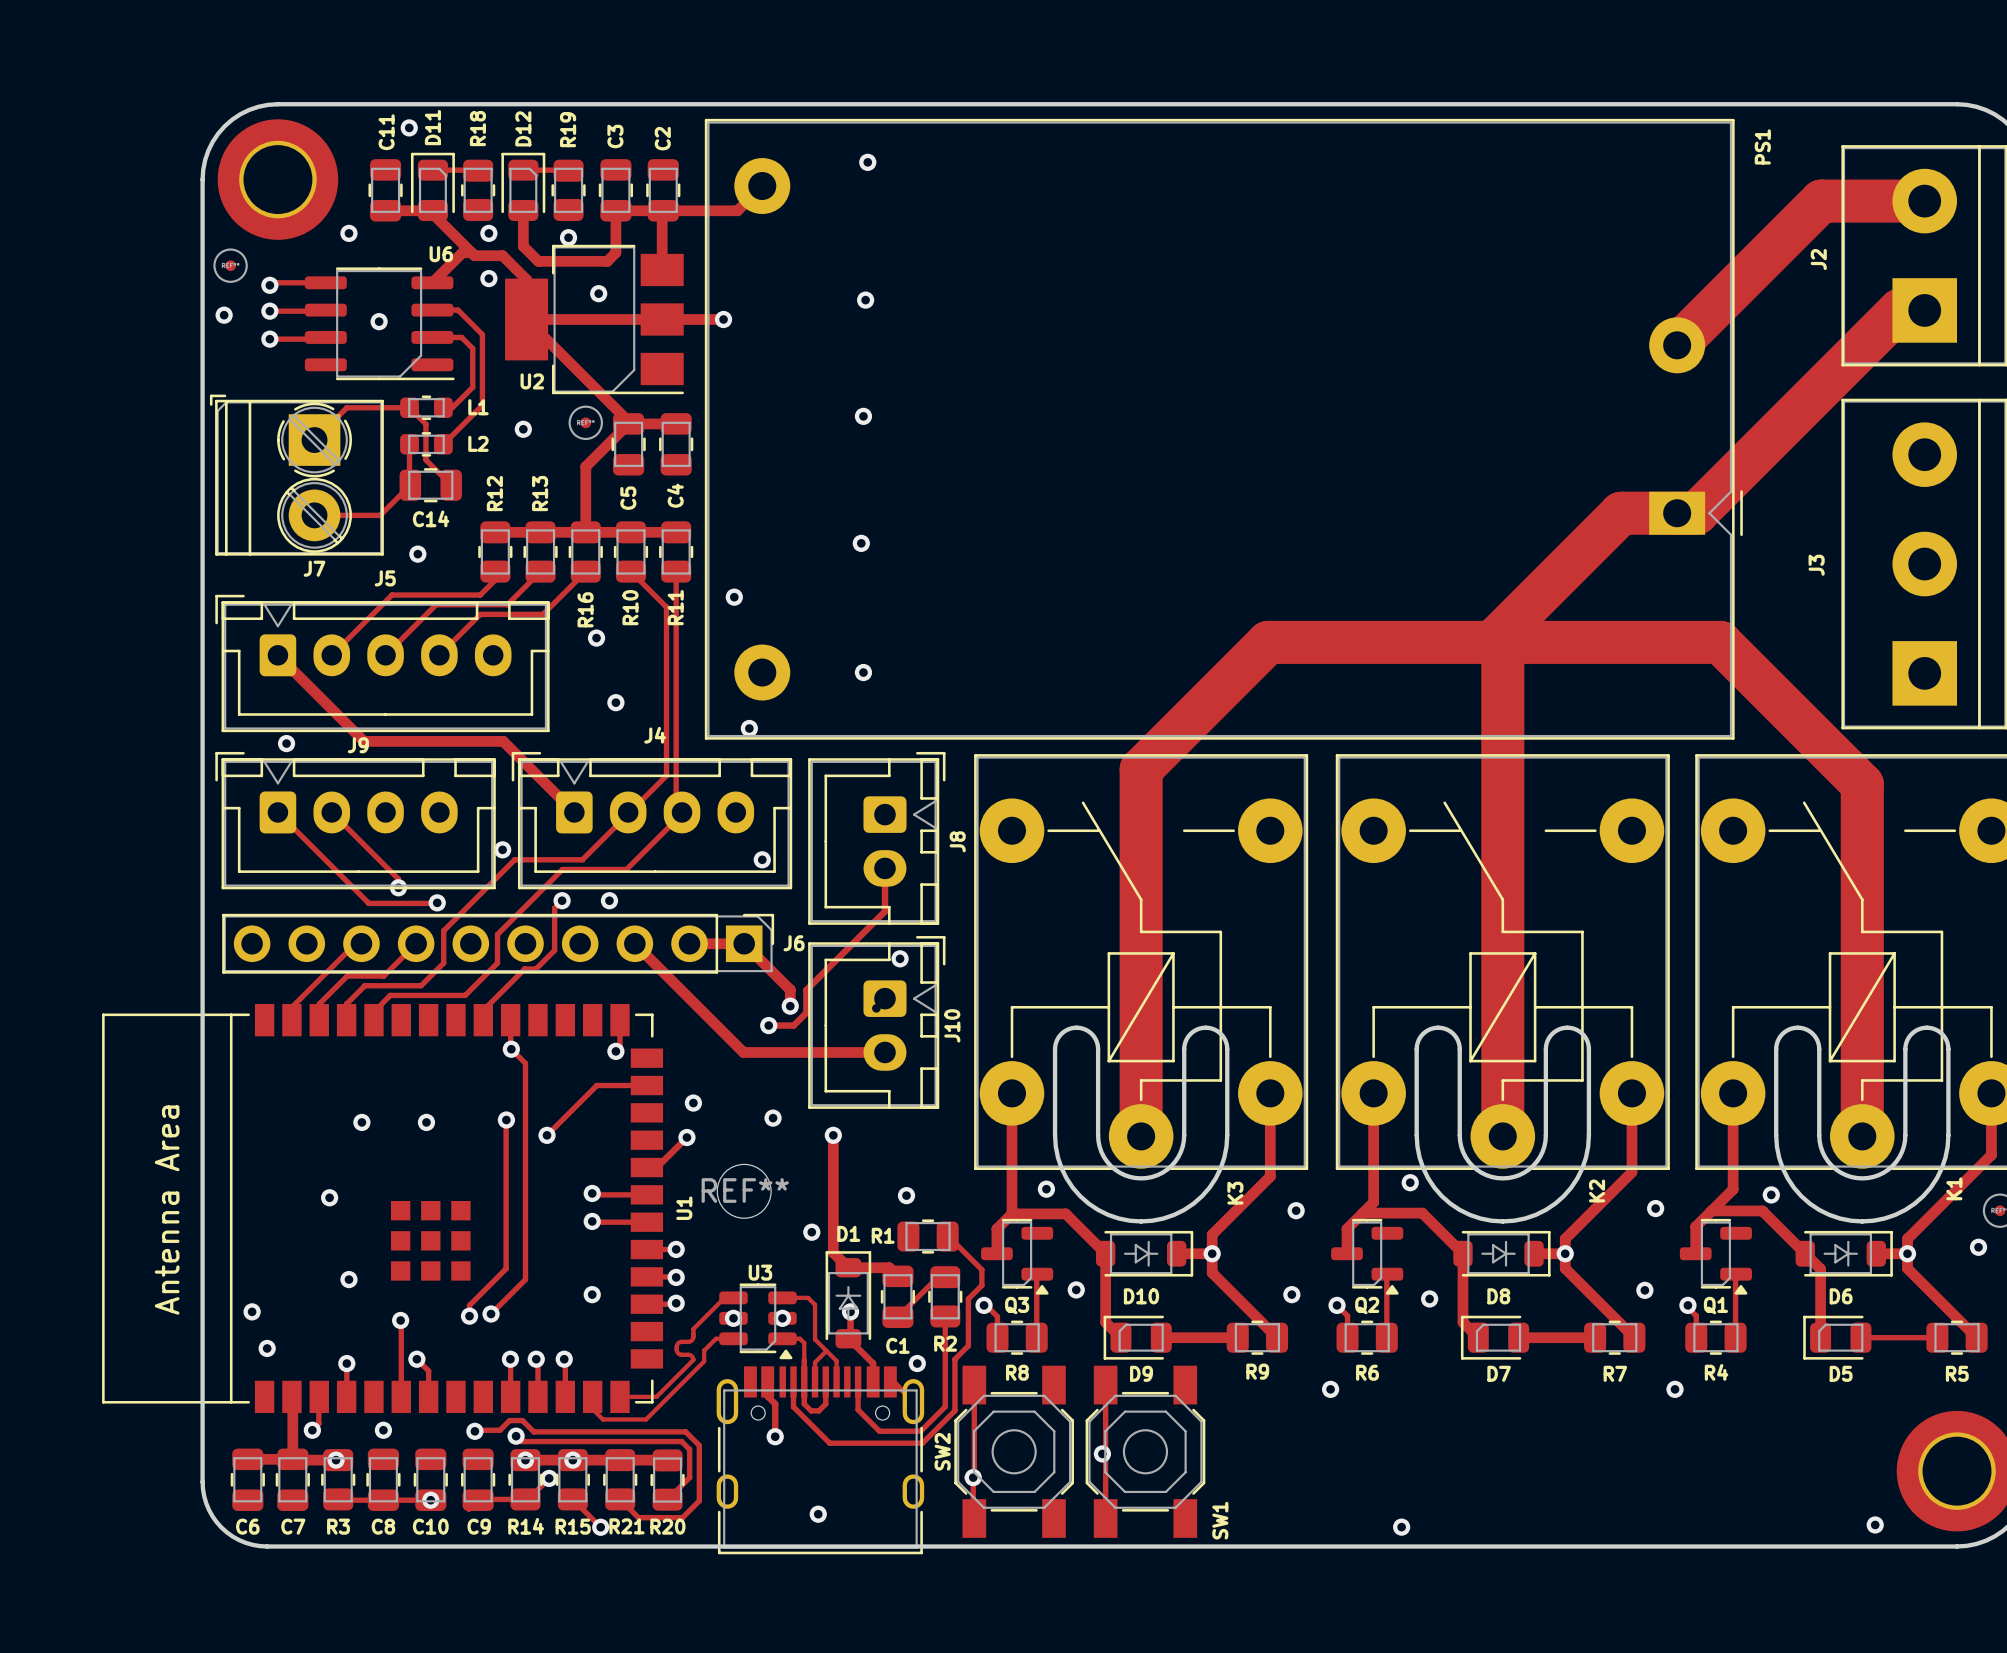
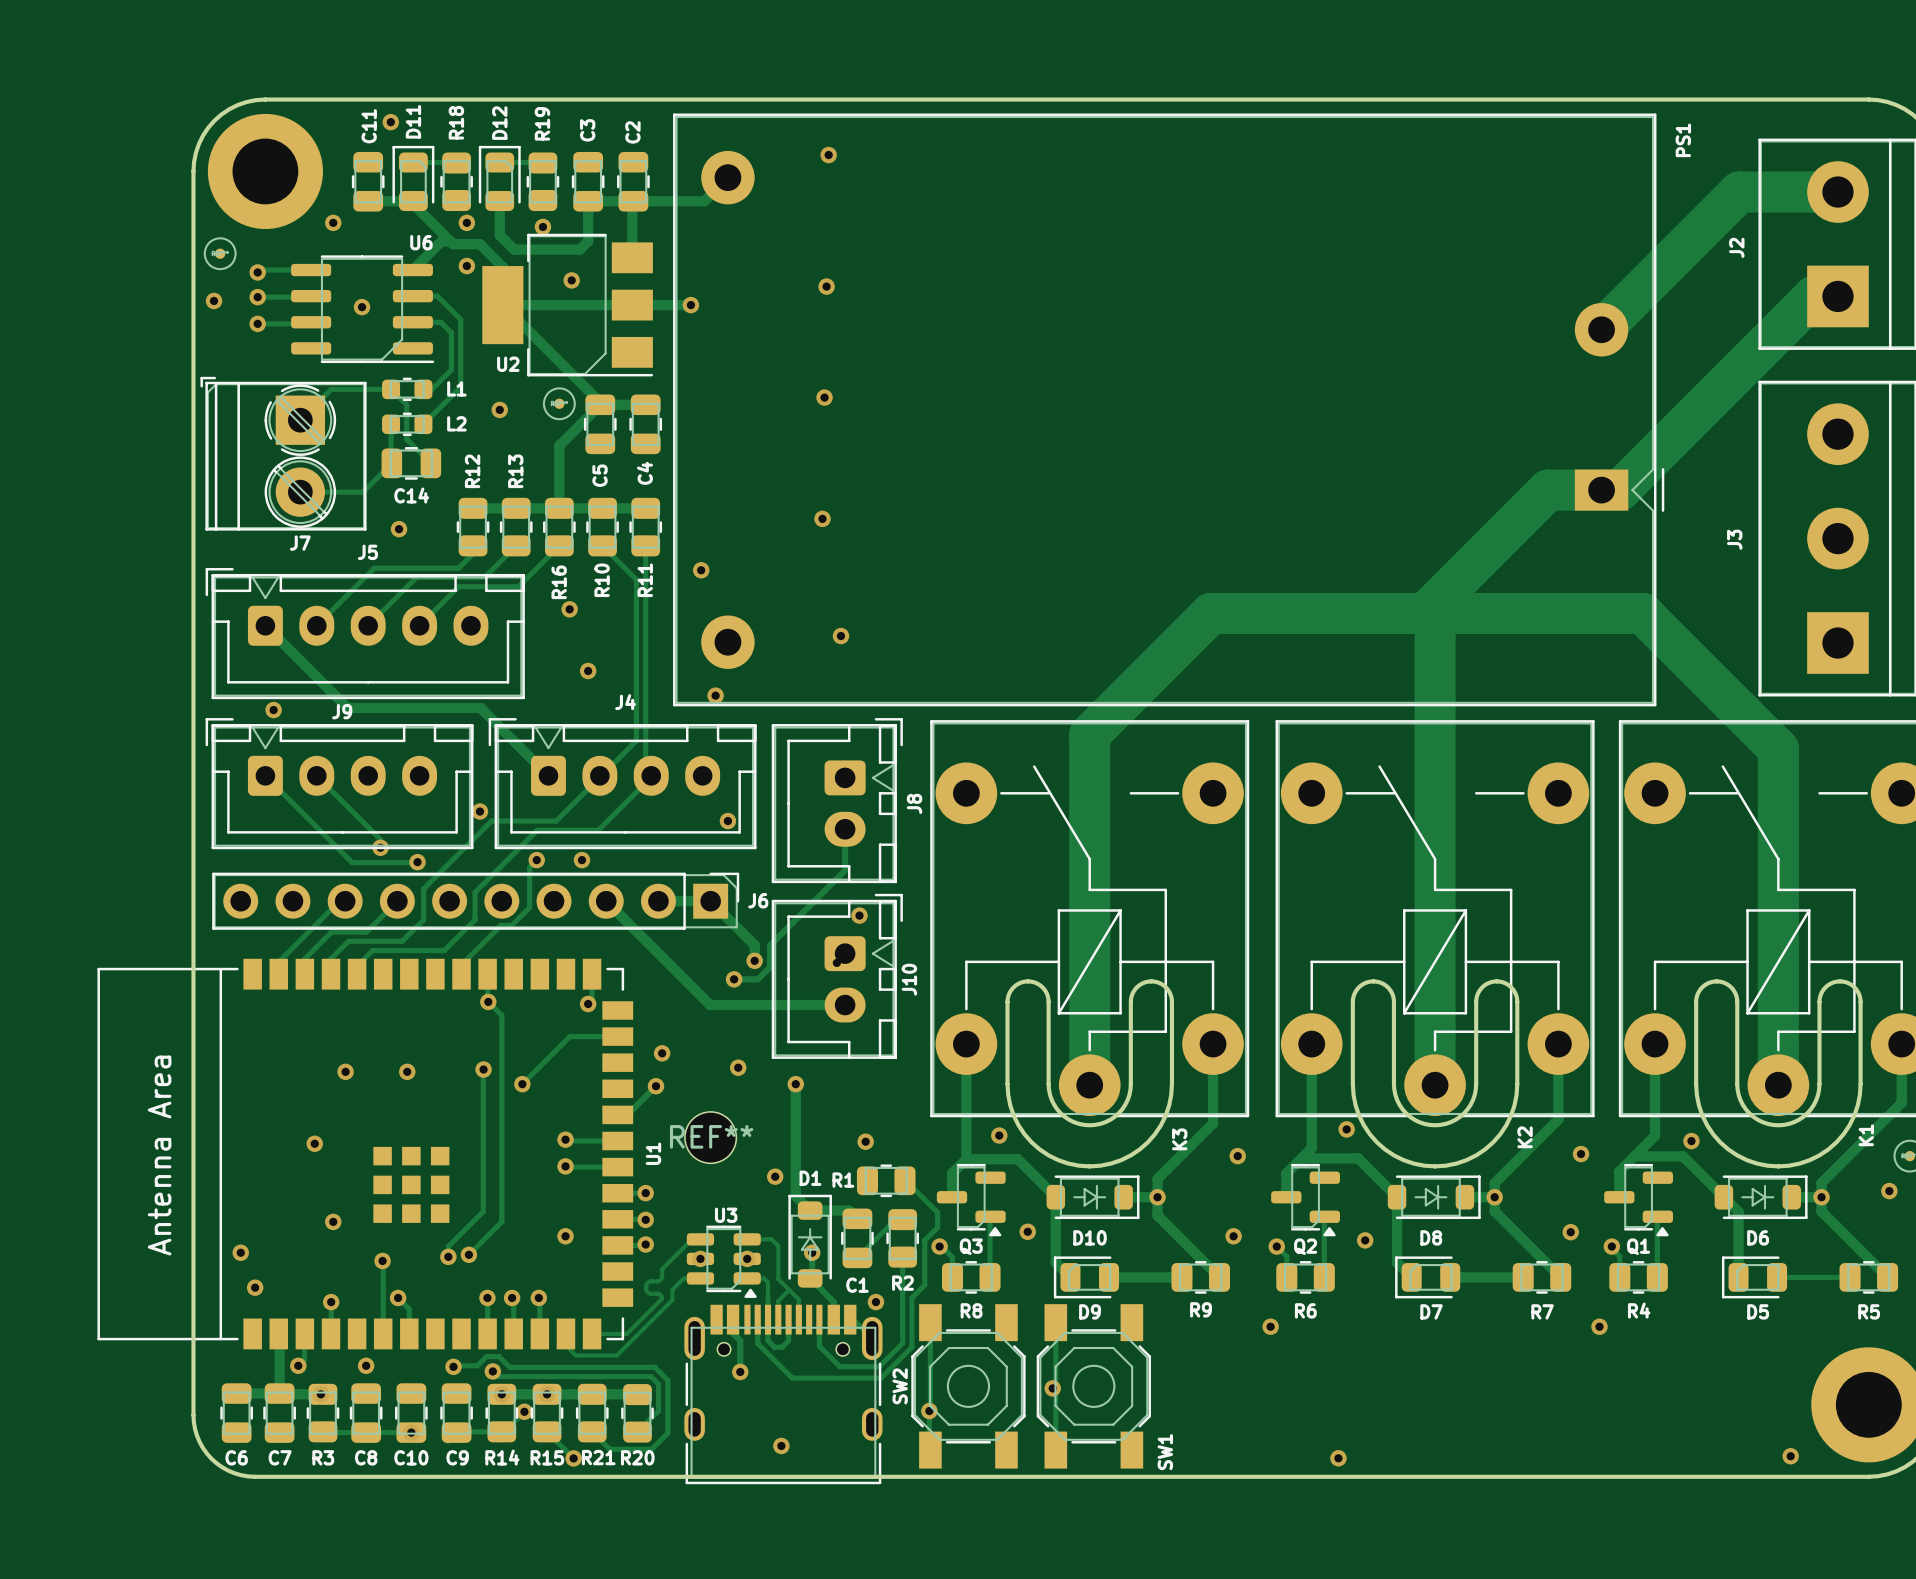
via position: (863, 672) -> (840, 636)

